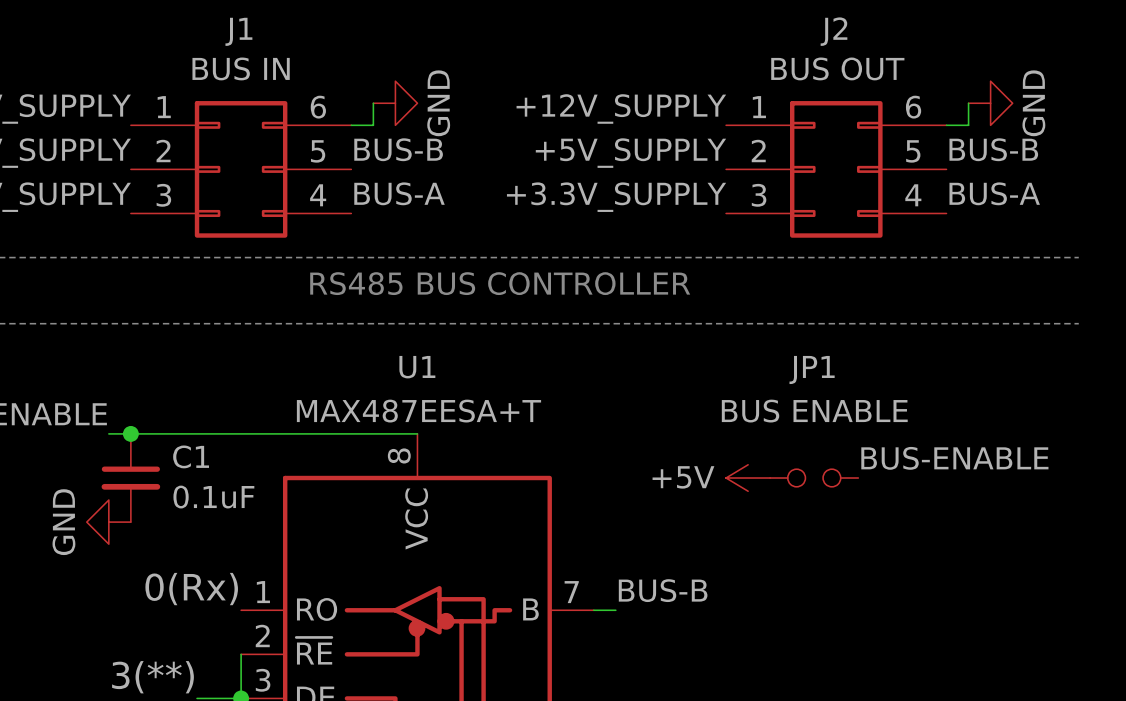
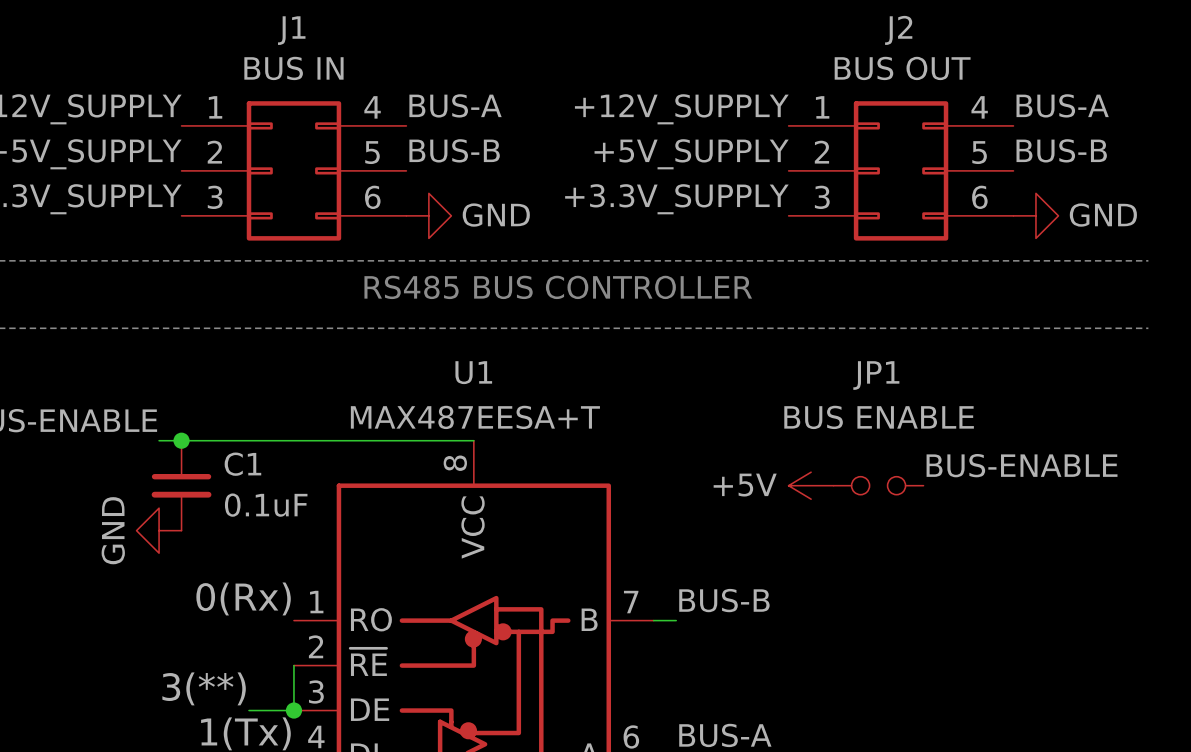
wire: (373, 103) (373, 125) (351, 125) -> none
power symbol position: GND (395, 103) -> GND (428, 215)
power symbol text rotation: 0° (438, 103) -> 90° clockwise (496, 215)
wire: (968, 103) (968, 125) (946, 125) -> none
power symbol position: GND (990, 103) -> GND (1035, 215)
power symbol text rotation: 0° (1033, 103) -> 90° clockwise (1103, 215)
J1 pin number: 6 (318, 107) -> 4 (372, 107)
J2 pin number: 6 (913, 107) -> 4 (979, 107)
label position: BUS-A (399, 193) -> BUS-A (455, 105)
label position: BUS-A (994, 193) -> BUS-A (1062, 105)
J1 pin number: 4 (318, 195) -> 6 (372, 197)
J2 pin number: 4 (913, 195) -> 6 (979, 197)

